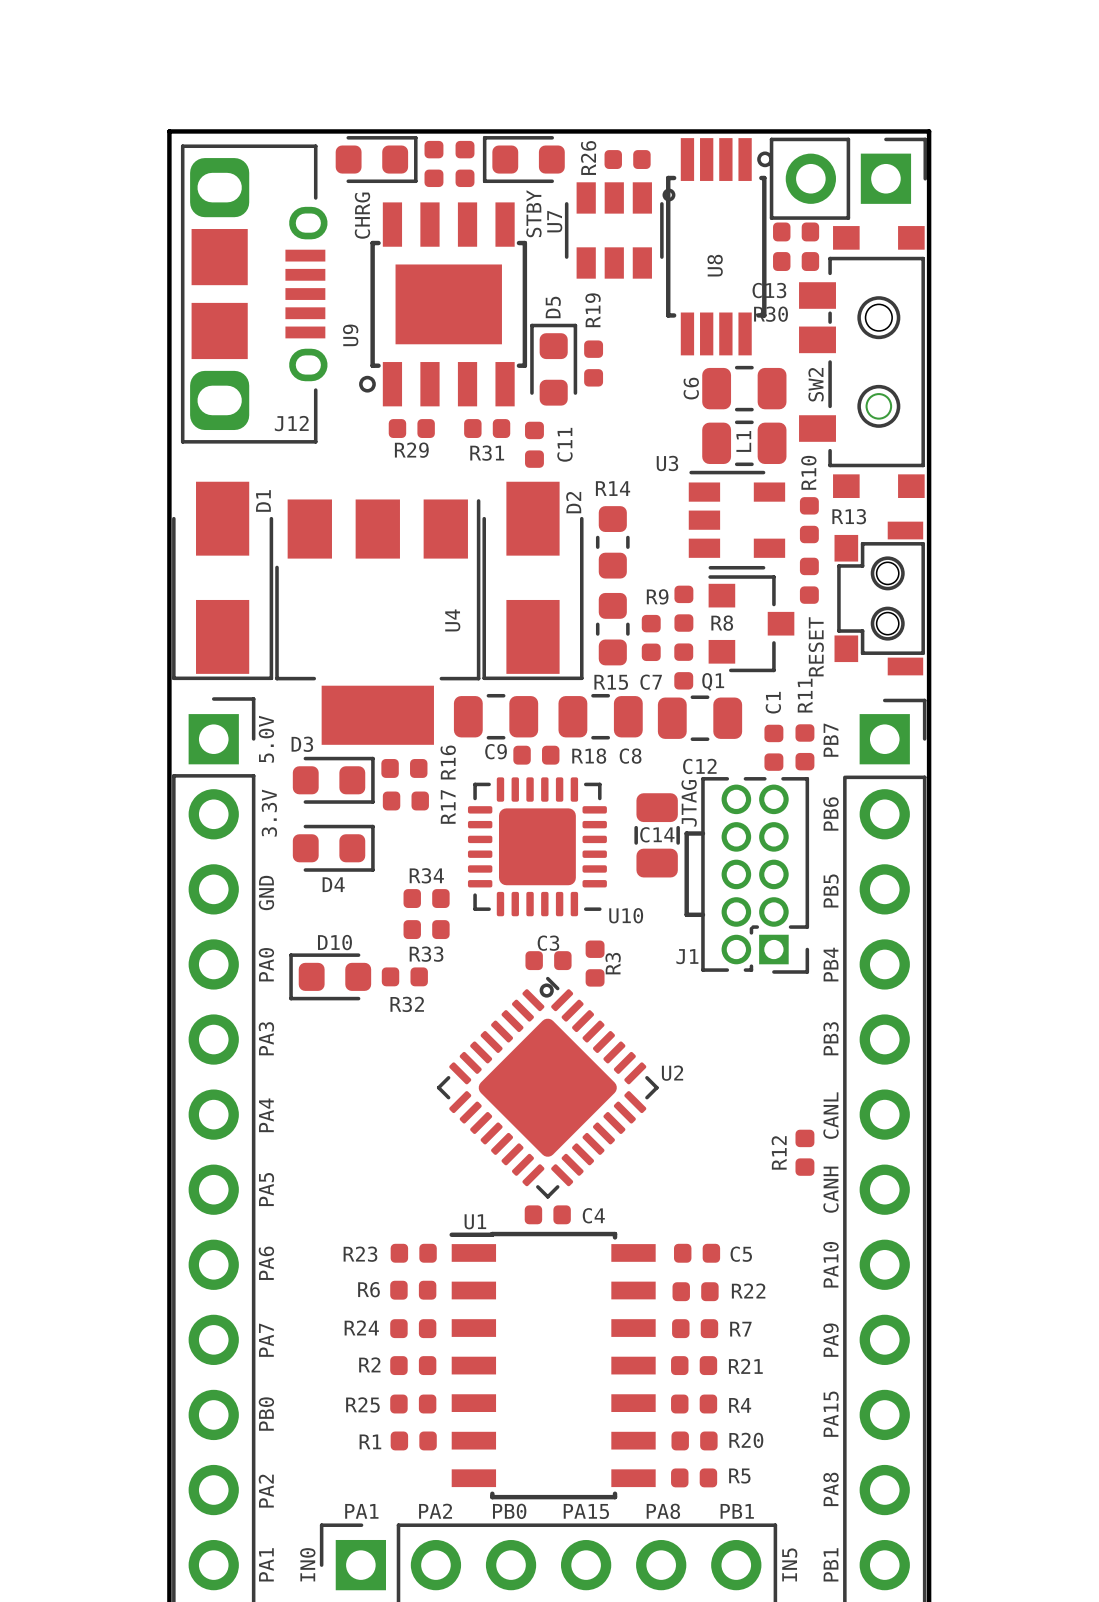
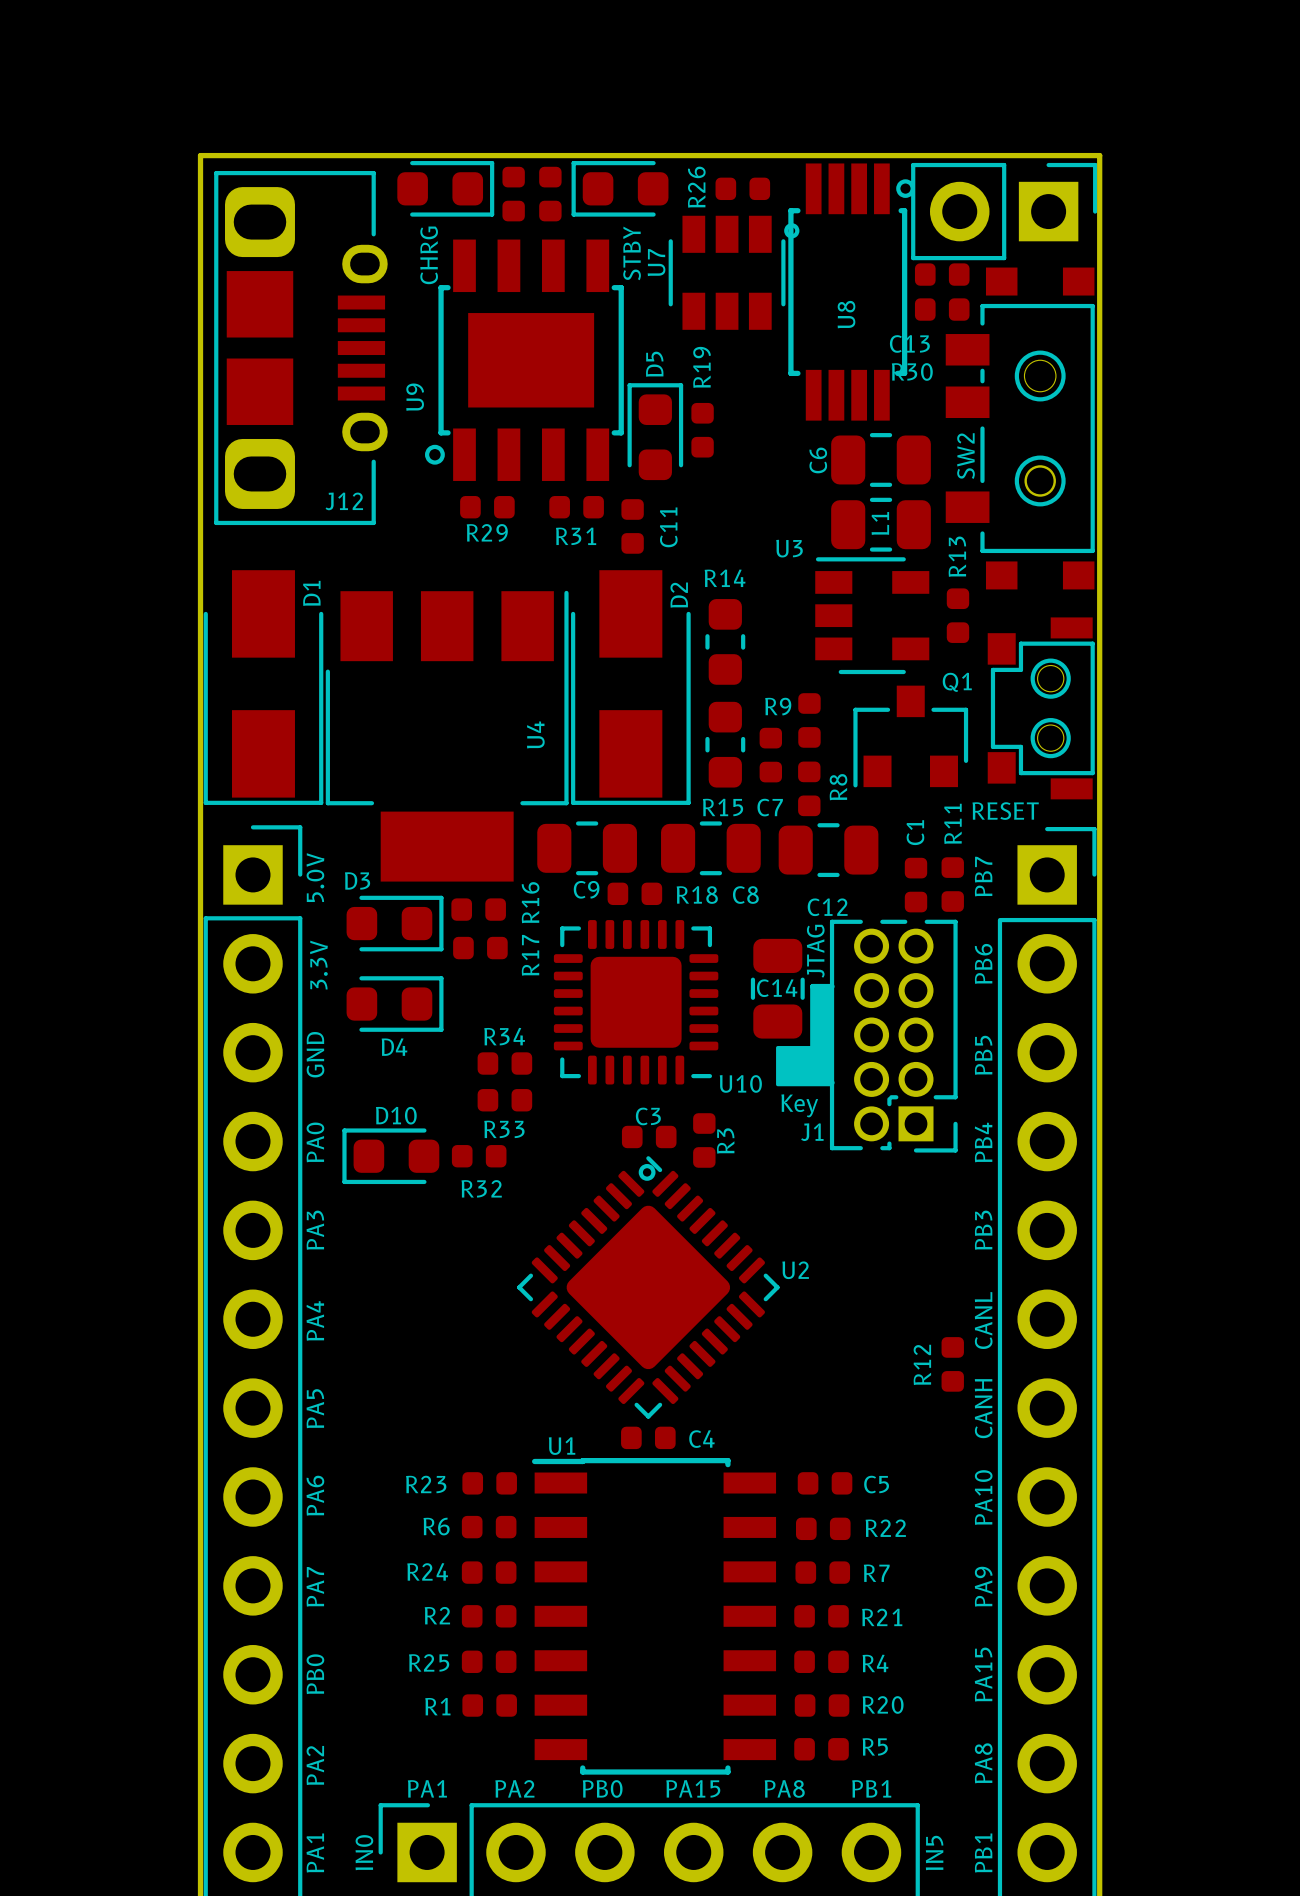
R10 name: R10 (808, 472) -> R13 (957, 556)
R13: (809, 580) -> none
R8 name rotation: 0° (722, 623) -> 90° counterclockwise (838, 787)
R8 name position: R8 (722, 623) -> R8 (838, 787)
Q1 rotation: 0° (751, 623) -> 90° counterclockwise (910, 736)
text rotation: 0° (816, 646) -> 90° clockwise (1005, 811)
Q1 name position: Q1 (713, 681) -> Q1 (957, 682)
drawing: none -> [776, 984, 834, 1087]
text: none -> Key (799, 1105)

